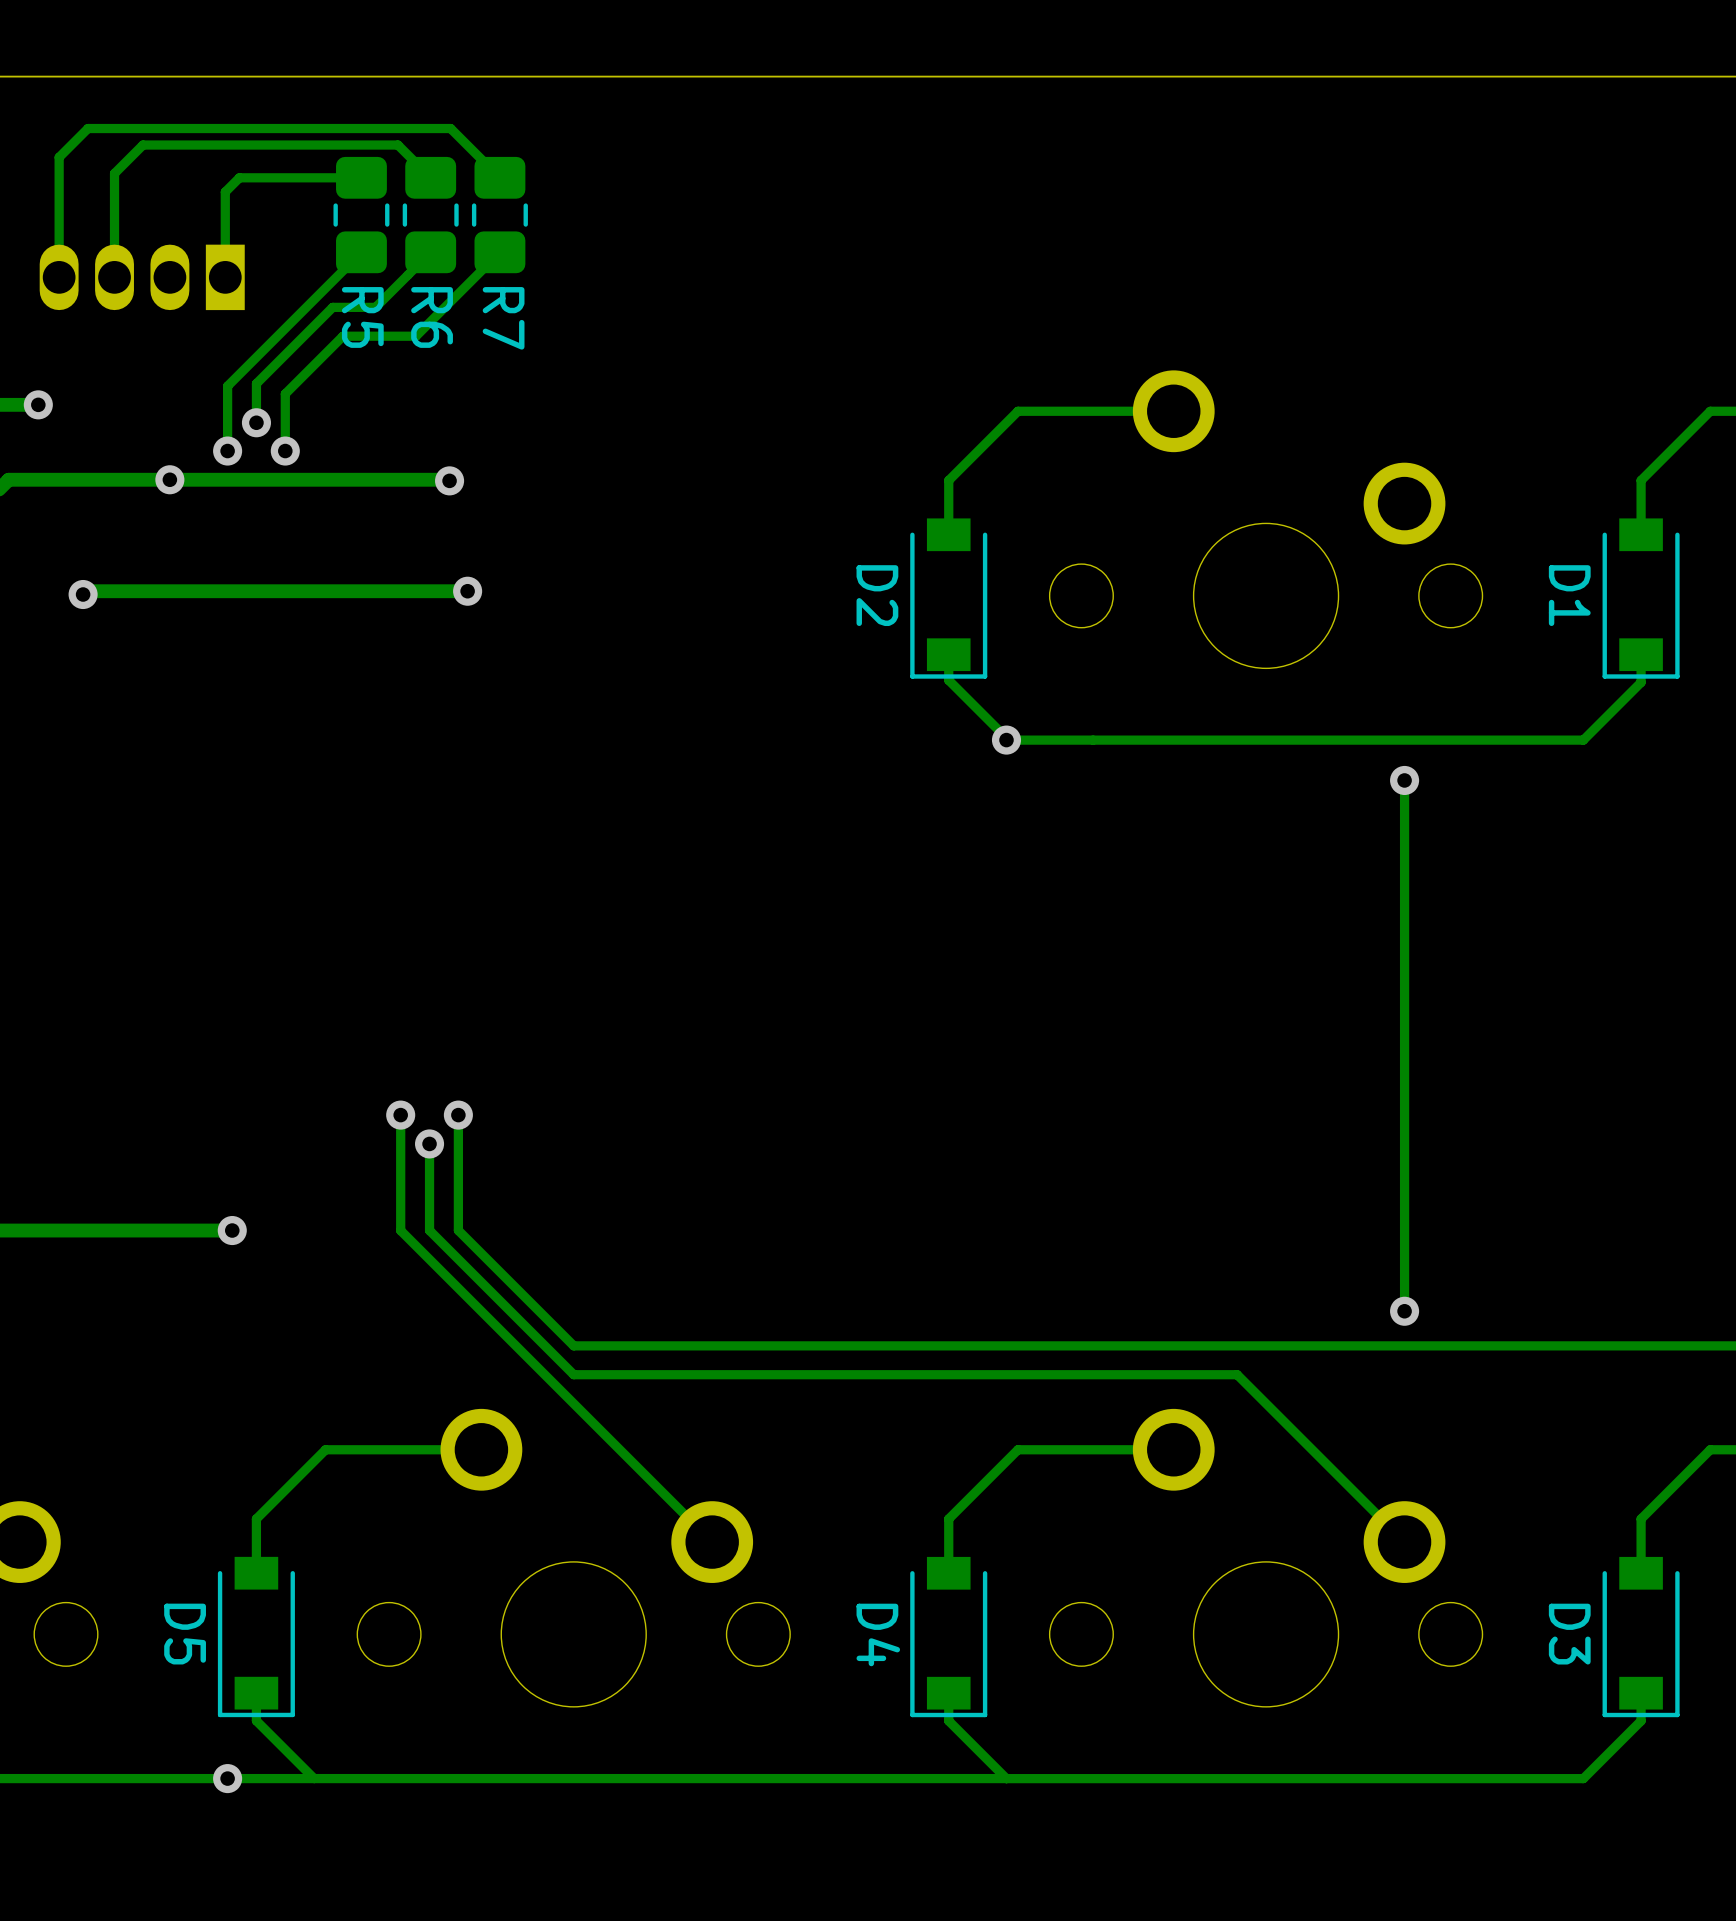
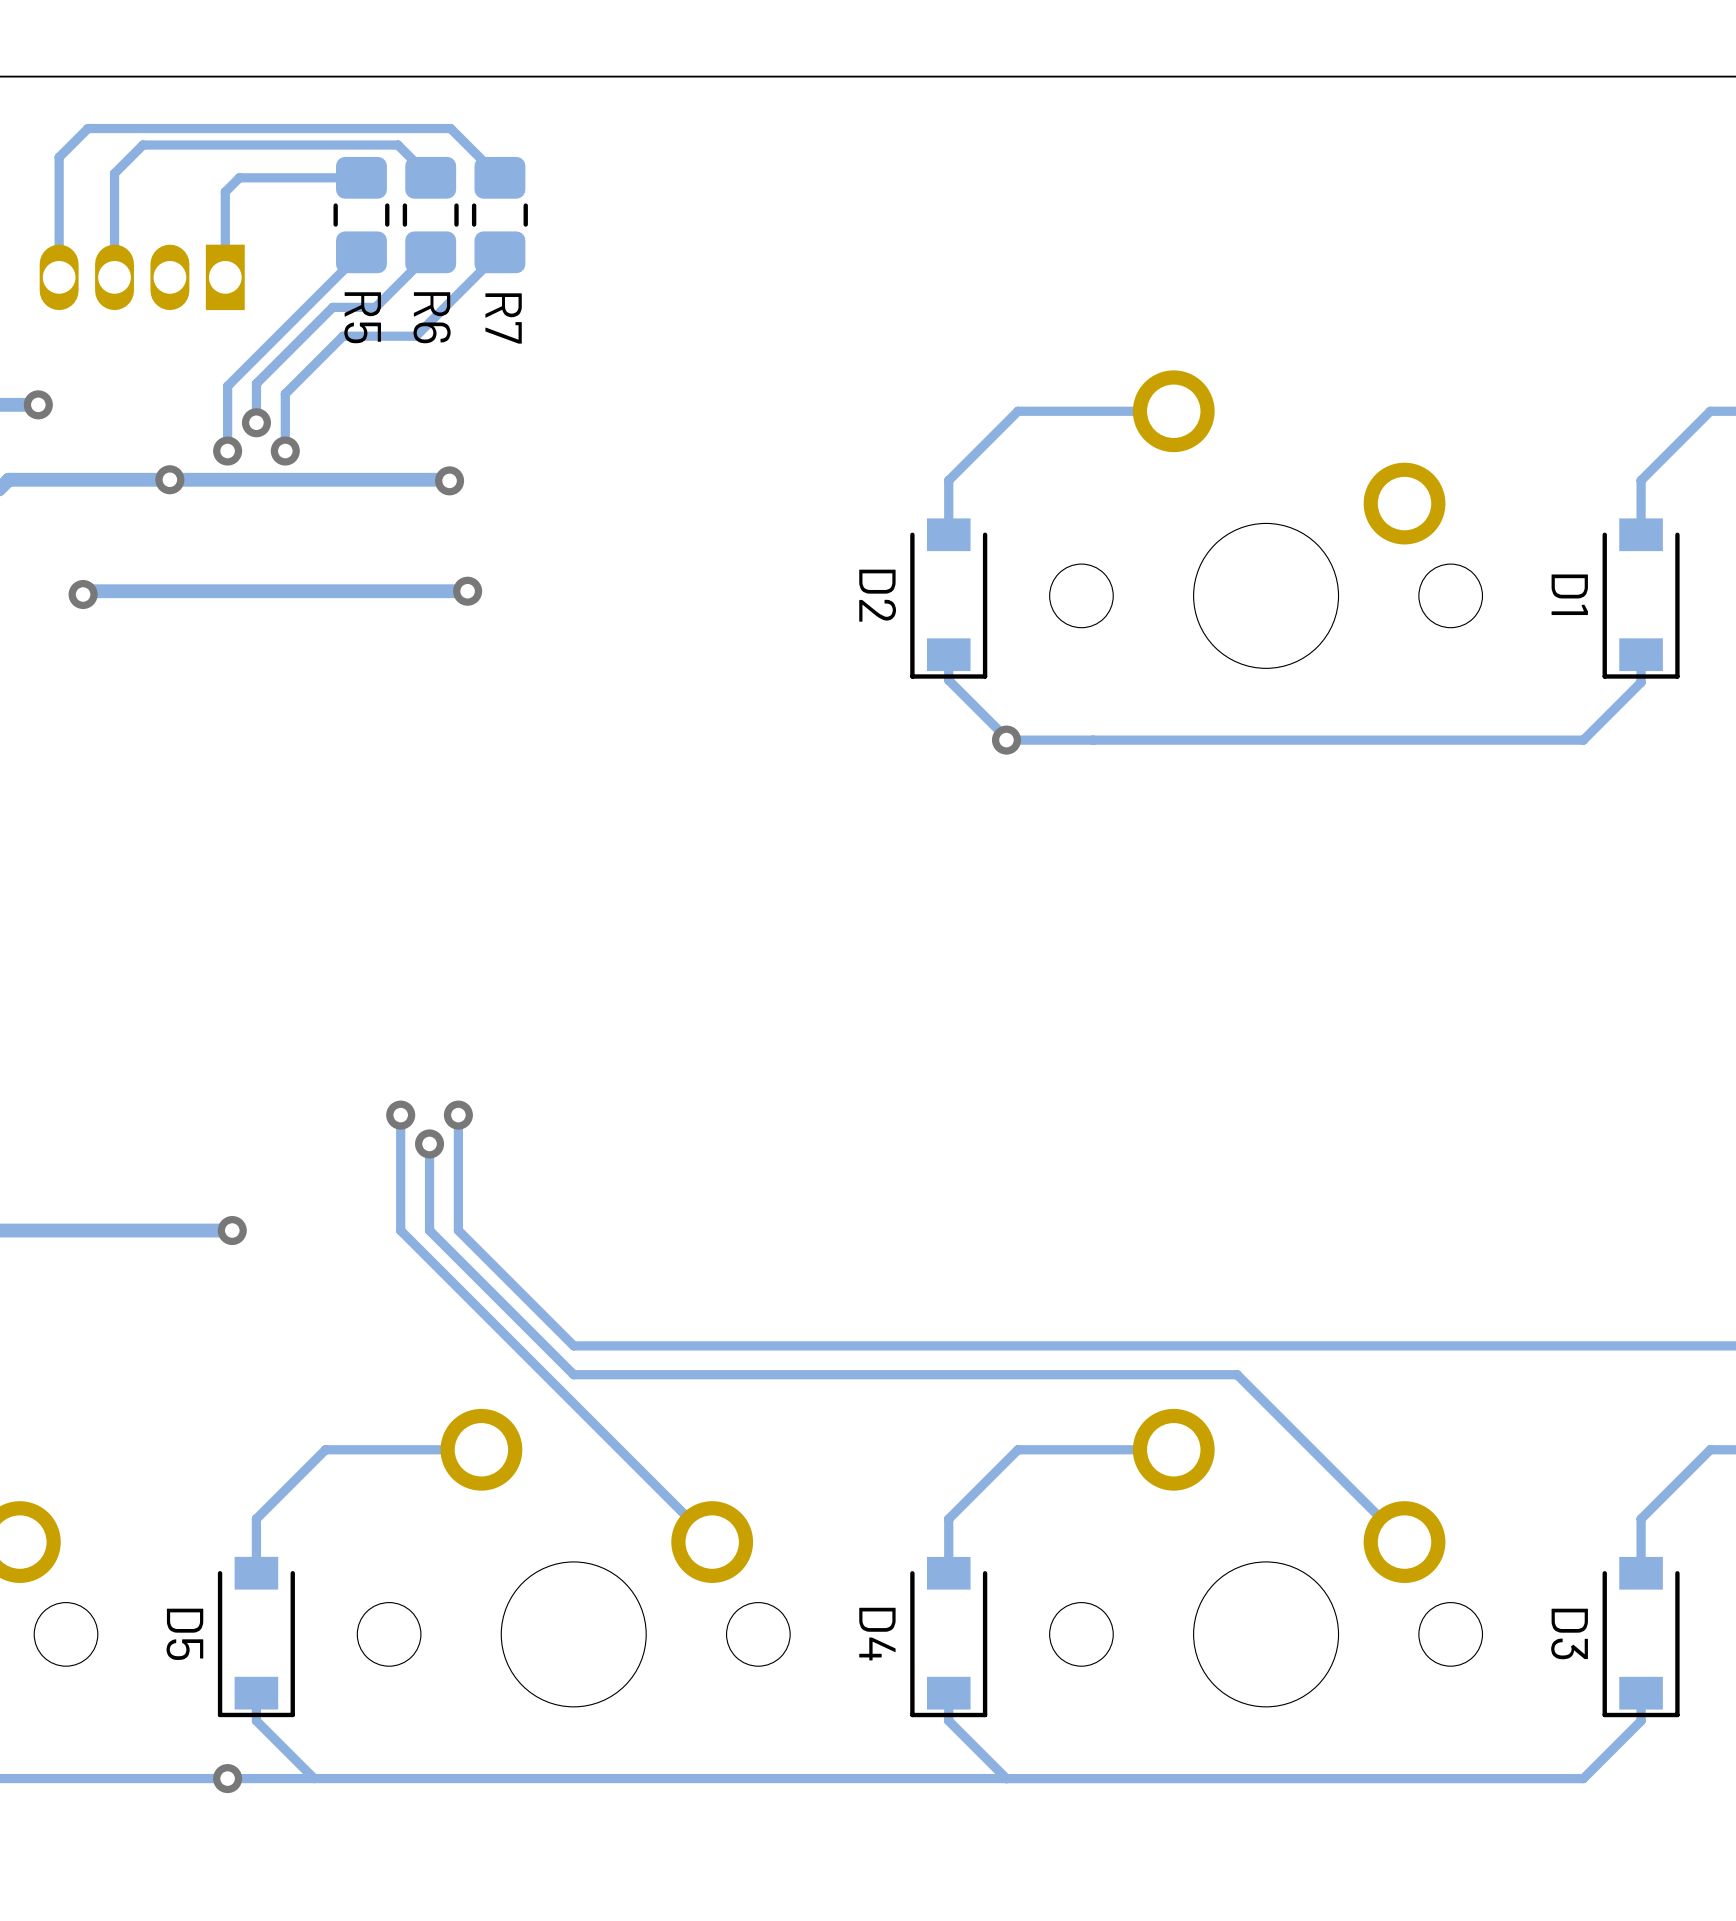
track: (1404, 780) (1404, 1311) -> none
via: (1404, 780) -> none
via: (1404, 1311) -> none

